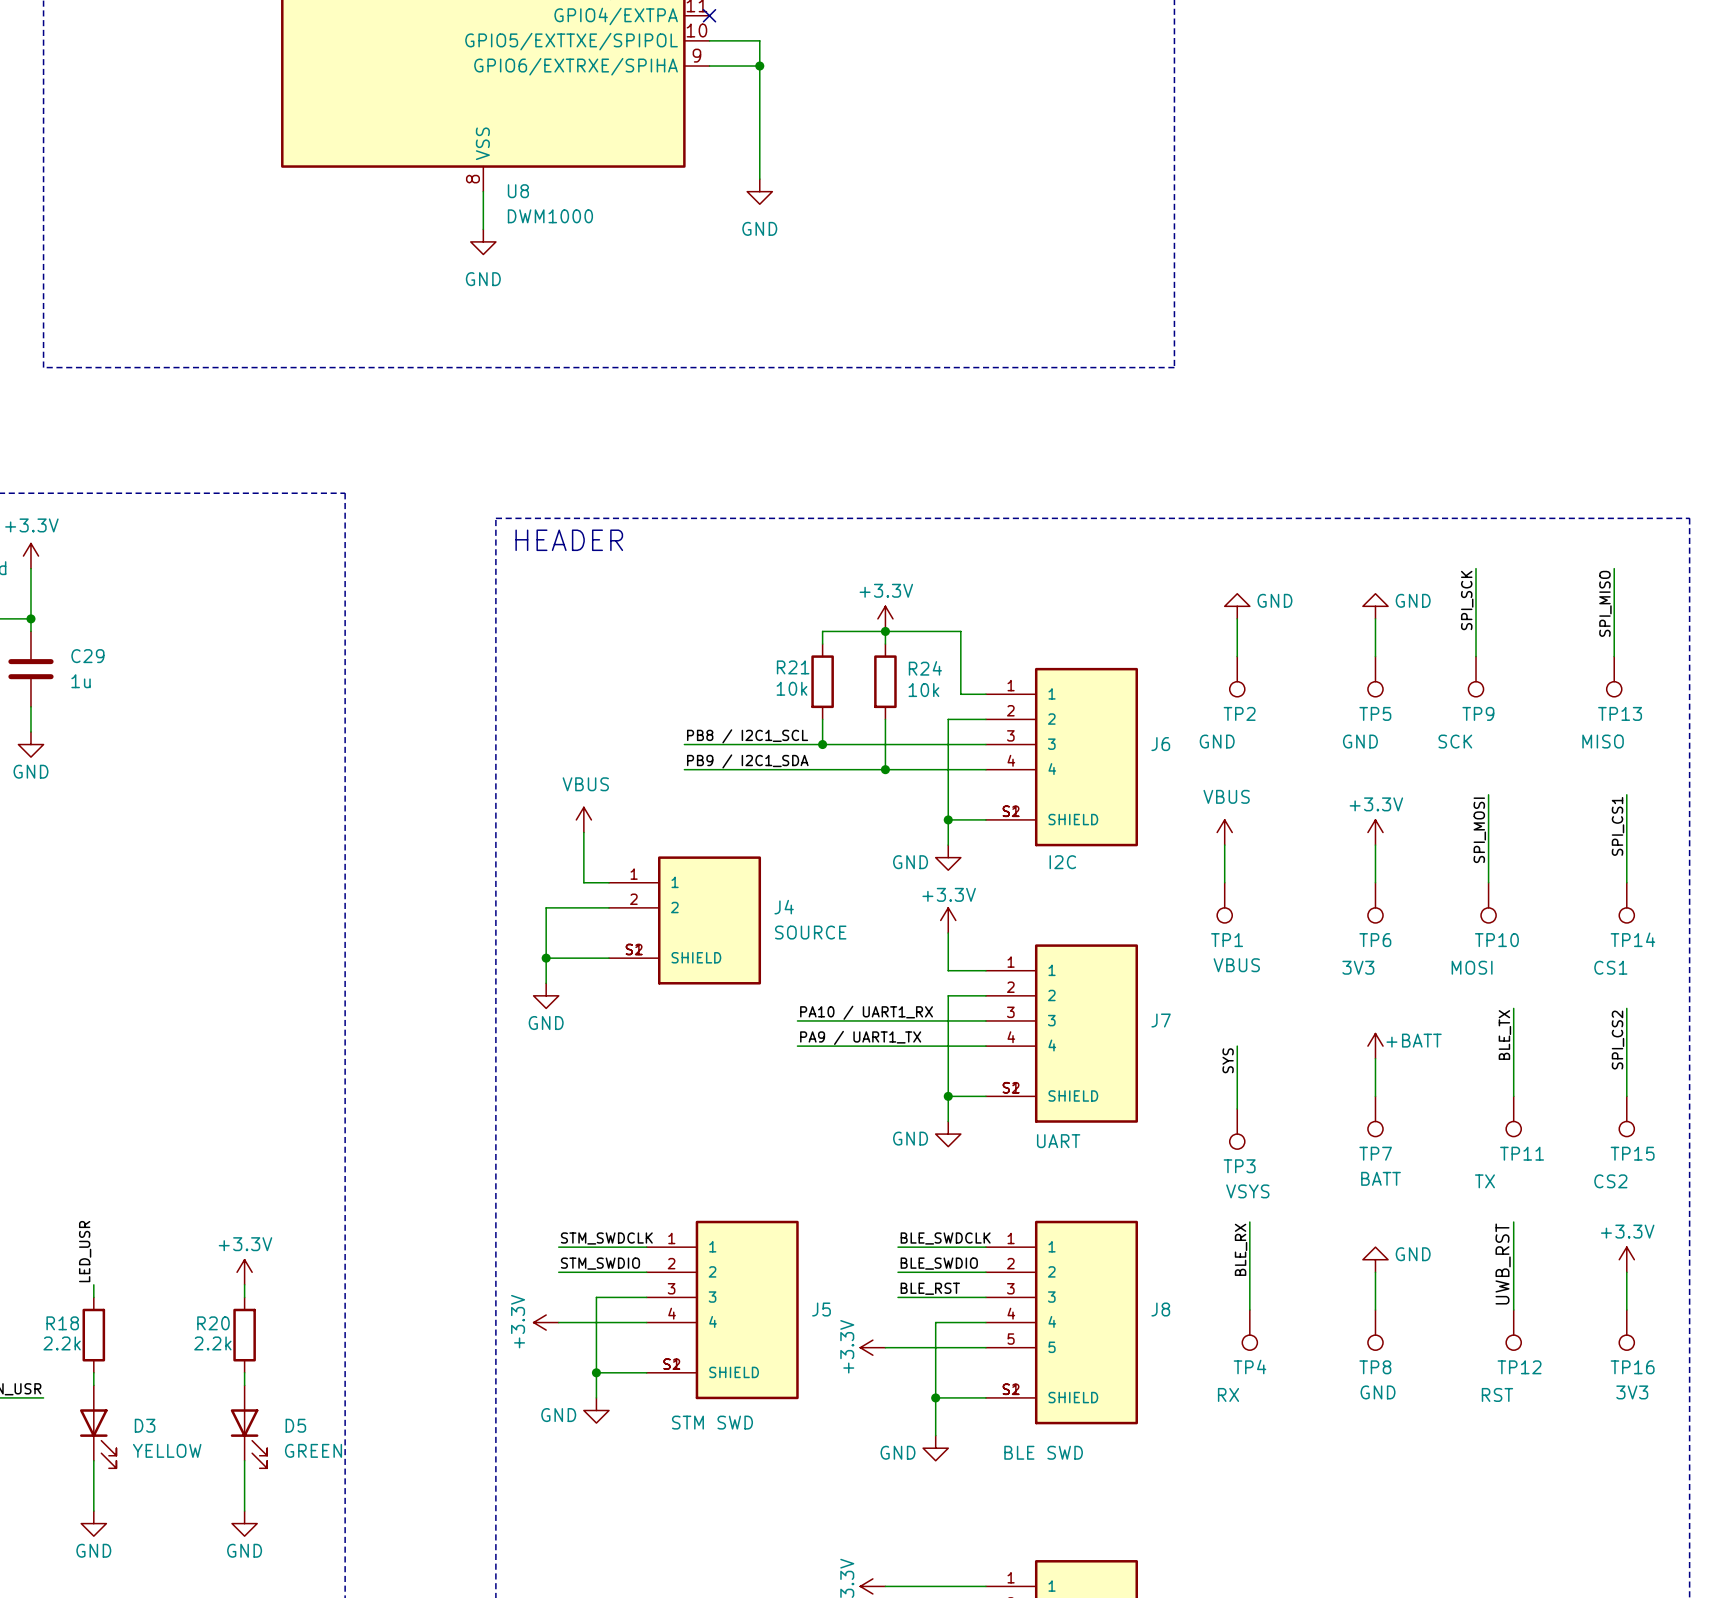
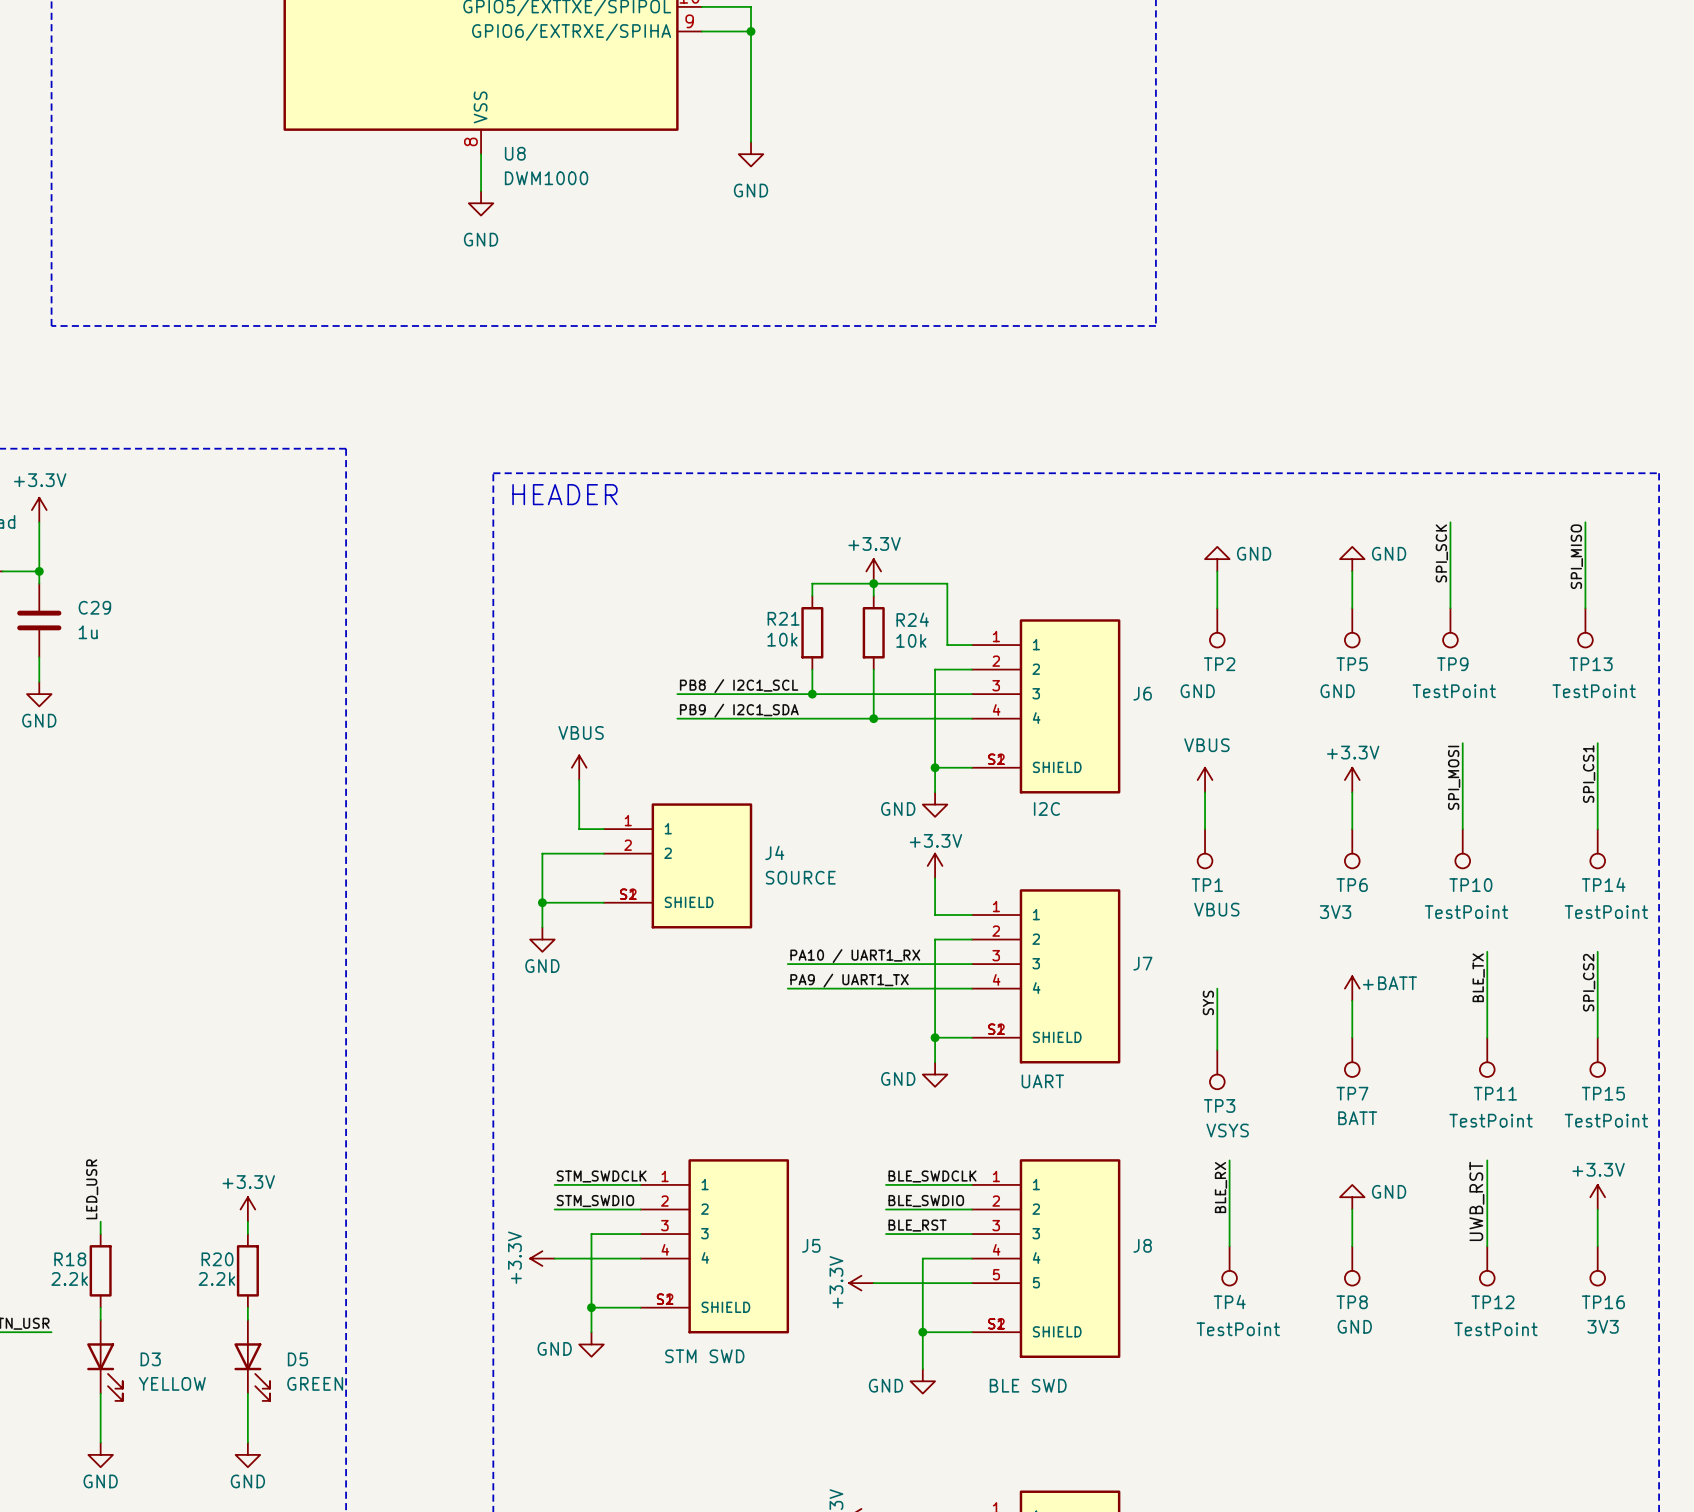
TP9 value: SCK (1455, 741) -> TestPoint (1454, 691)
TP13 value: MISO (1603, 741) -> TestPoint (1594, 691)
TP10 value: MOSI (1472, 967) -> TestPoint (1466, 912)
TP14 value: CS1 (1610, 967) -> TestPoint (1606, 912)
TP11 value: TX (1484, 1181) -> TestPoint (1491, 1120)
TP15 value: CS2 (1610, 1181) -> TestPoint (1606, 1120)
TP4 value: RX (1228, 1394) -> TestPoint (1238, 1329)
TP12 value: RST (1497, 1394) -> TestPoint (1495, 1329)

